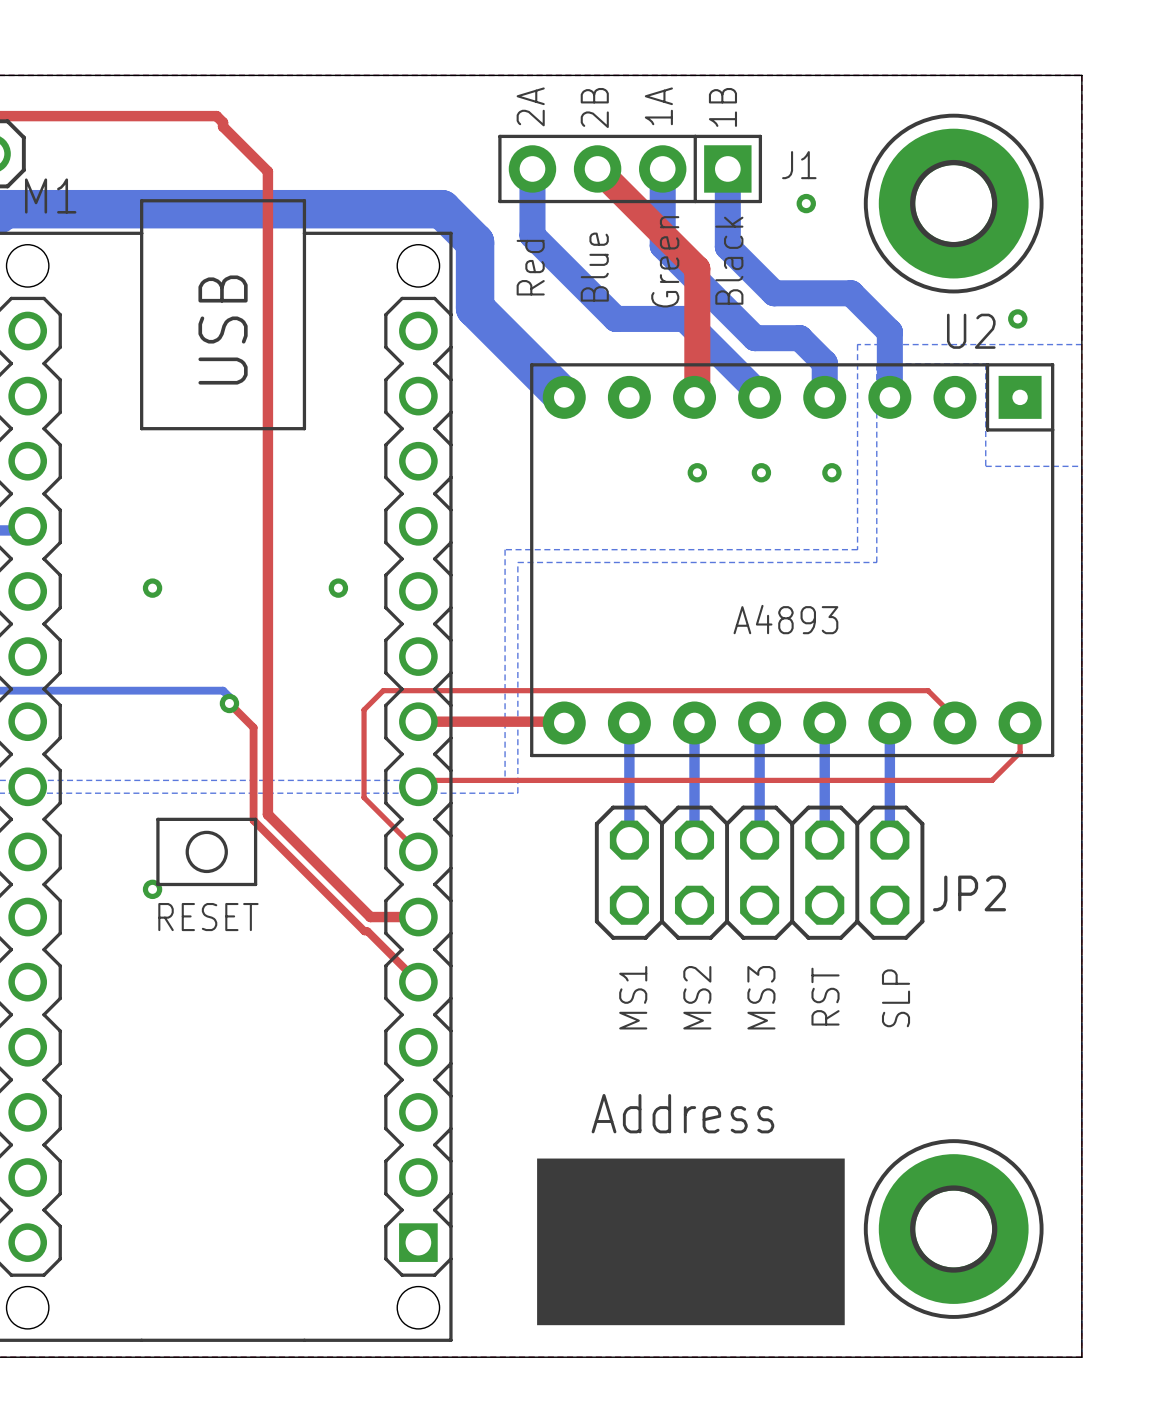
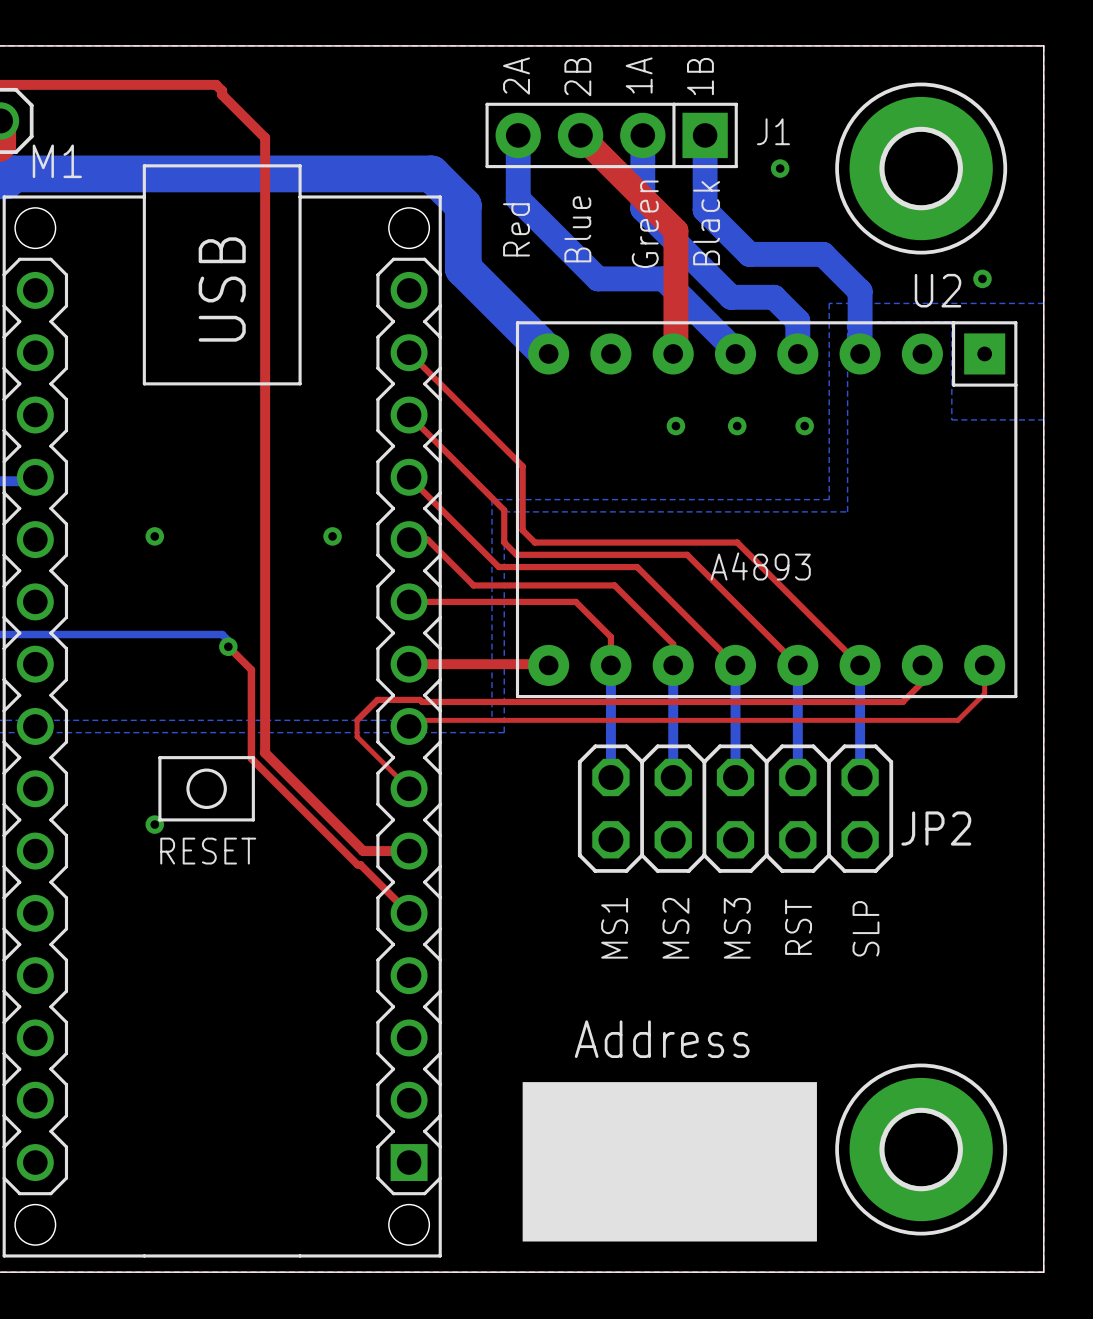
top track: none -> (409, 352) (522, 466) (522, 530) (534, 542) (737, 542) (860, 665)
top track: none -> (409, 415) (504, 510) (504, 542) (516, 554) (687, 554) (797, 665)
top track: none -> (409, 477) (498, 567) (637, 567) (735, 665)
top track: none -> (409, 539) (427, 539) (473, 585) (614, 585) (673, 644) (673, 665)
top track: none -> (409, 601) (575, 601) (610, 636) (610, 665)
top track: (954, 722) (954, 717) (928, 690) (383, 690) (364, 709) (364, 780) -> (922, 665) (922, 682) (902, 701) (422, 701) (420, 699) (377, 699) (357, 720)

